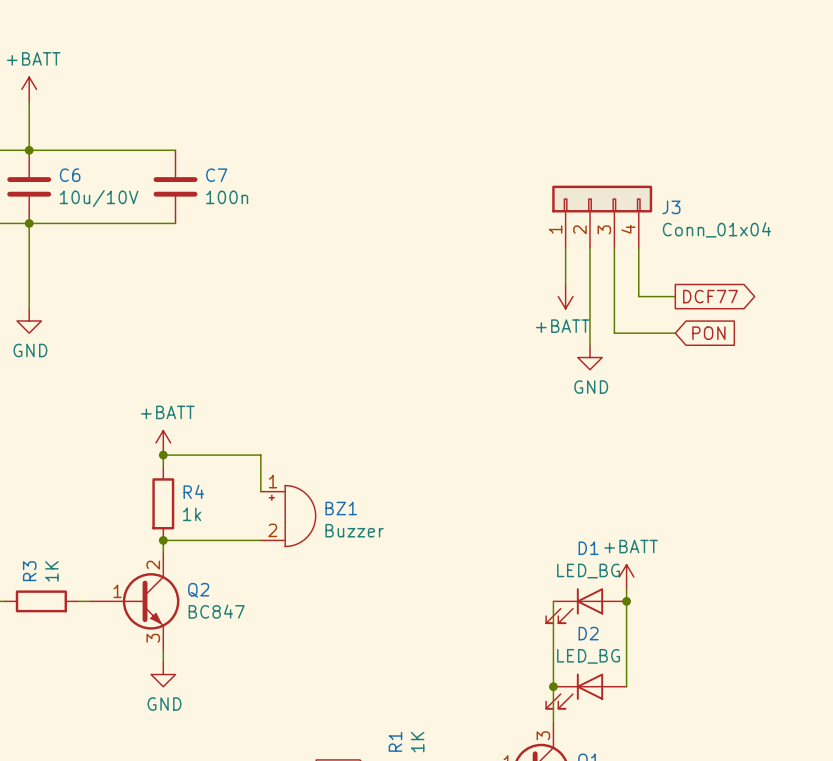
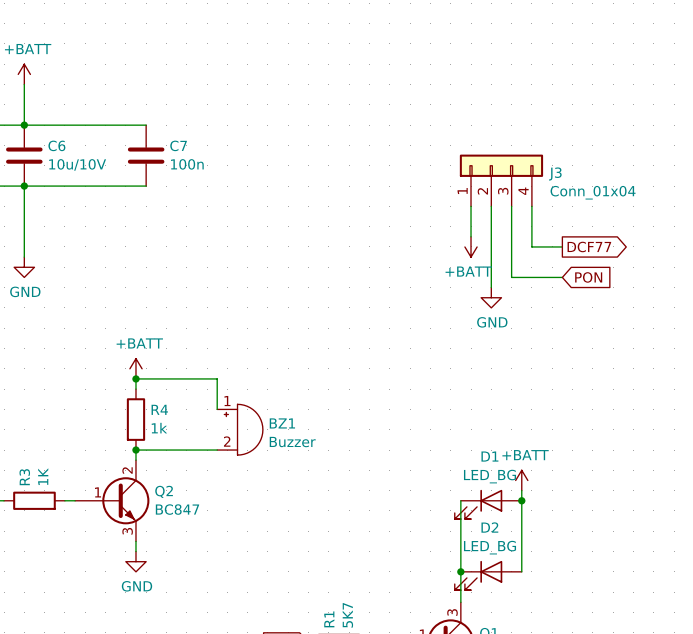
R1 value: 1K (417, 742) -> 5K7 (347, 615)

